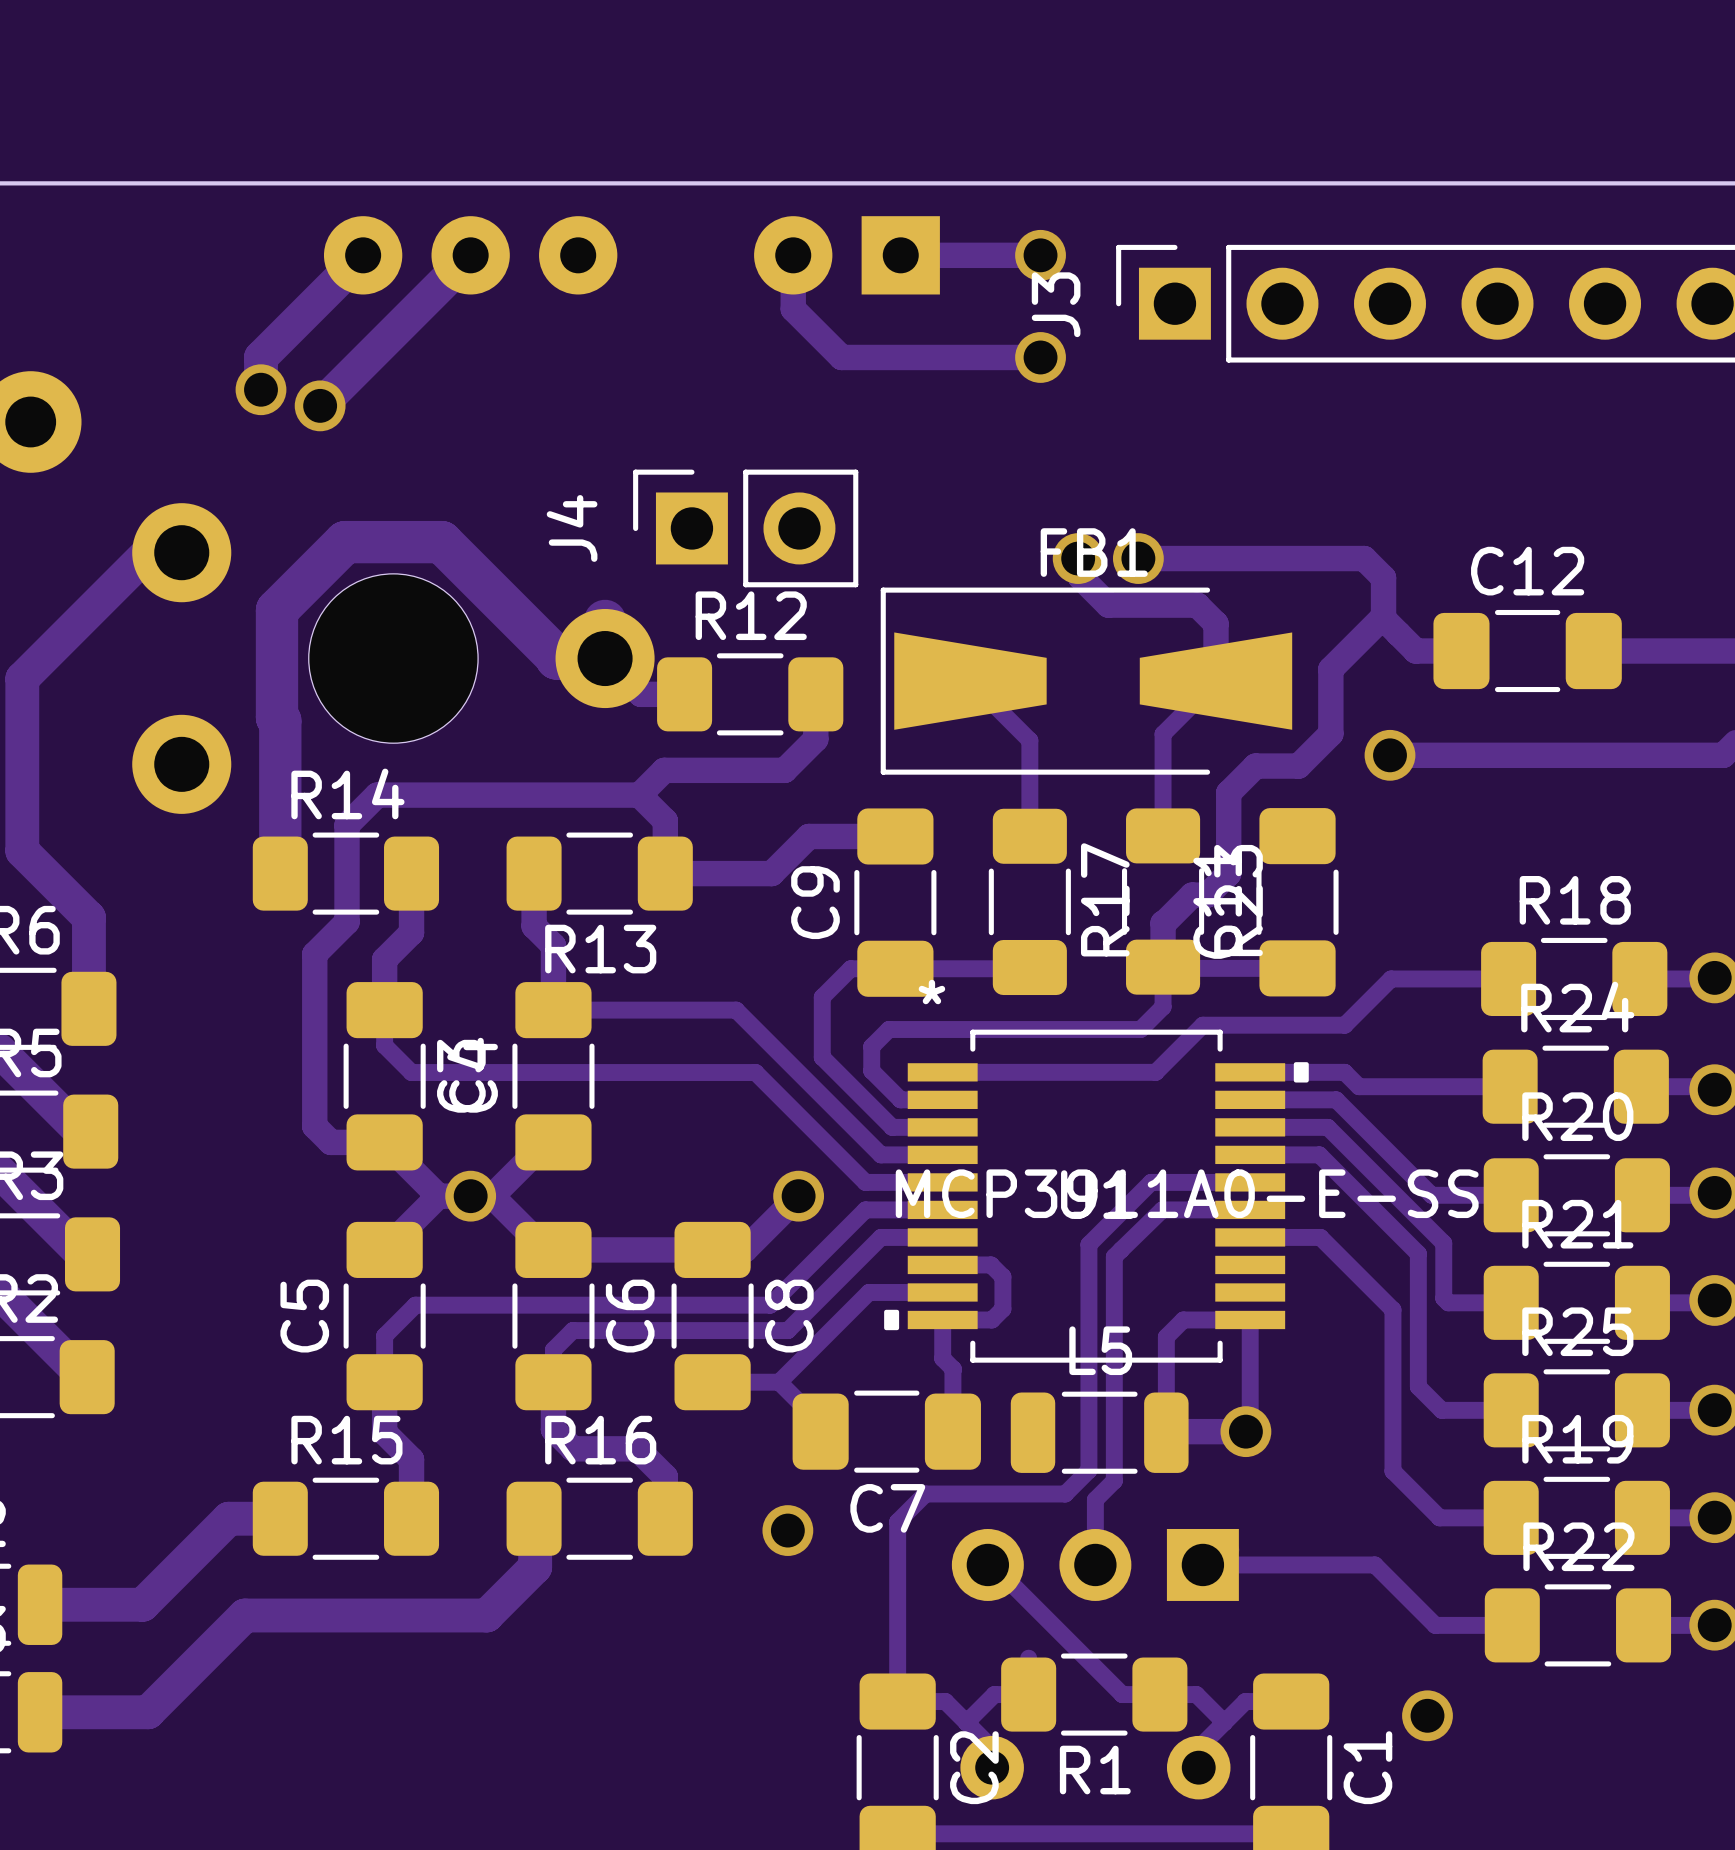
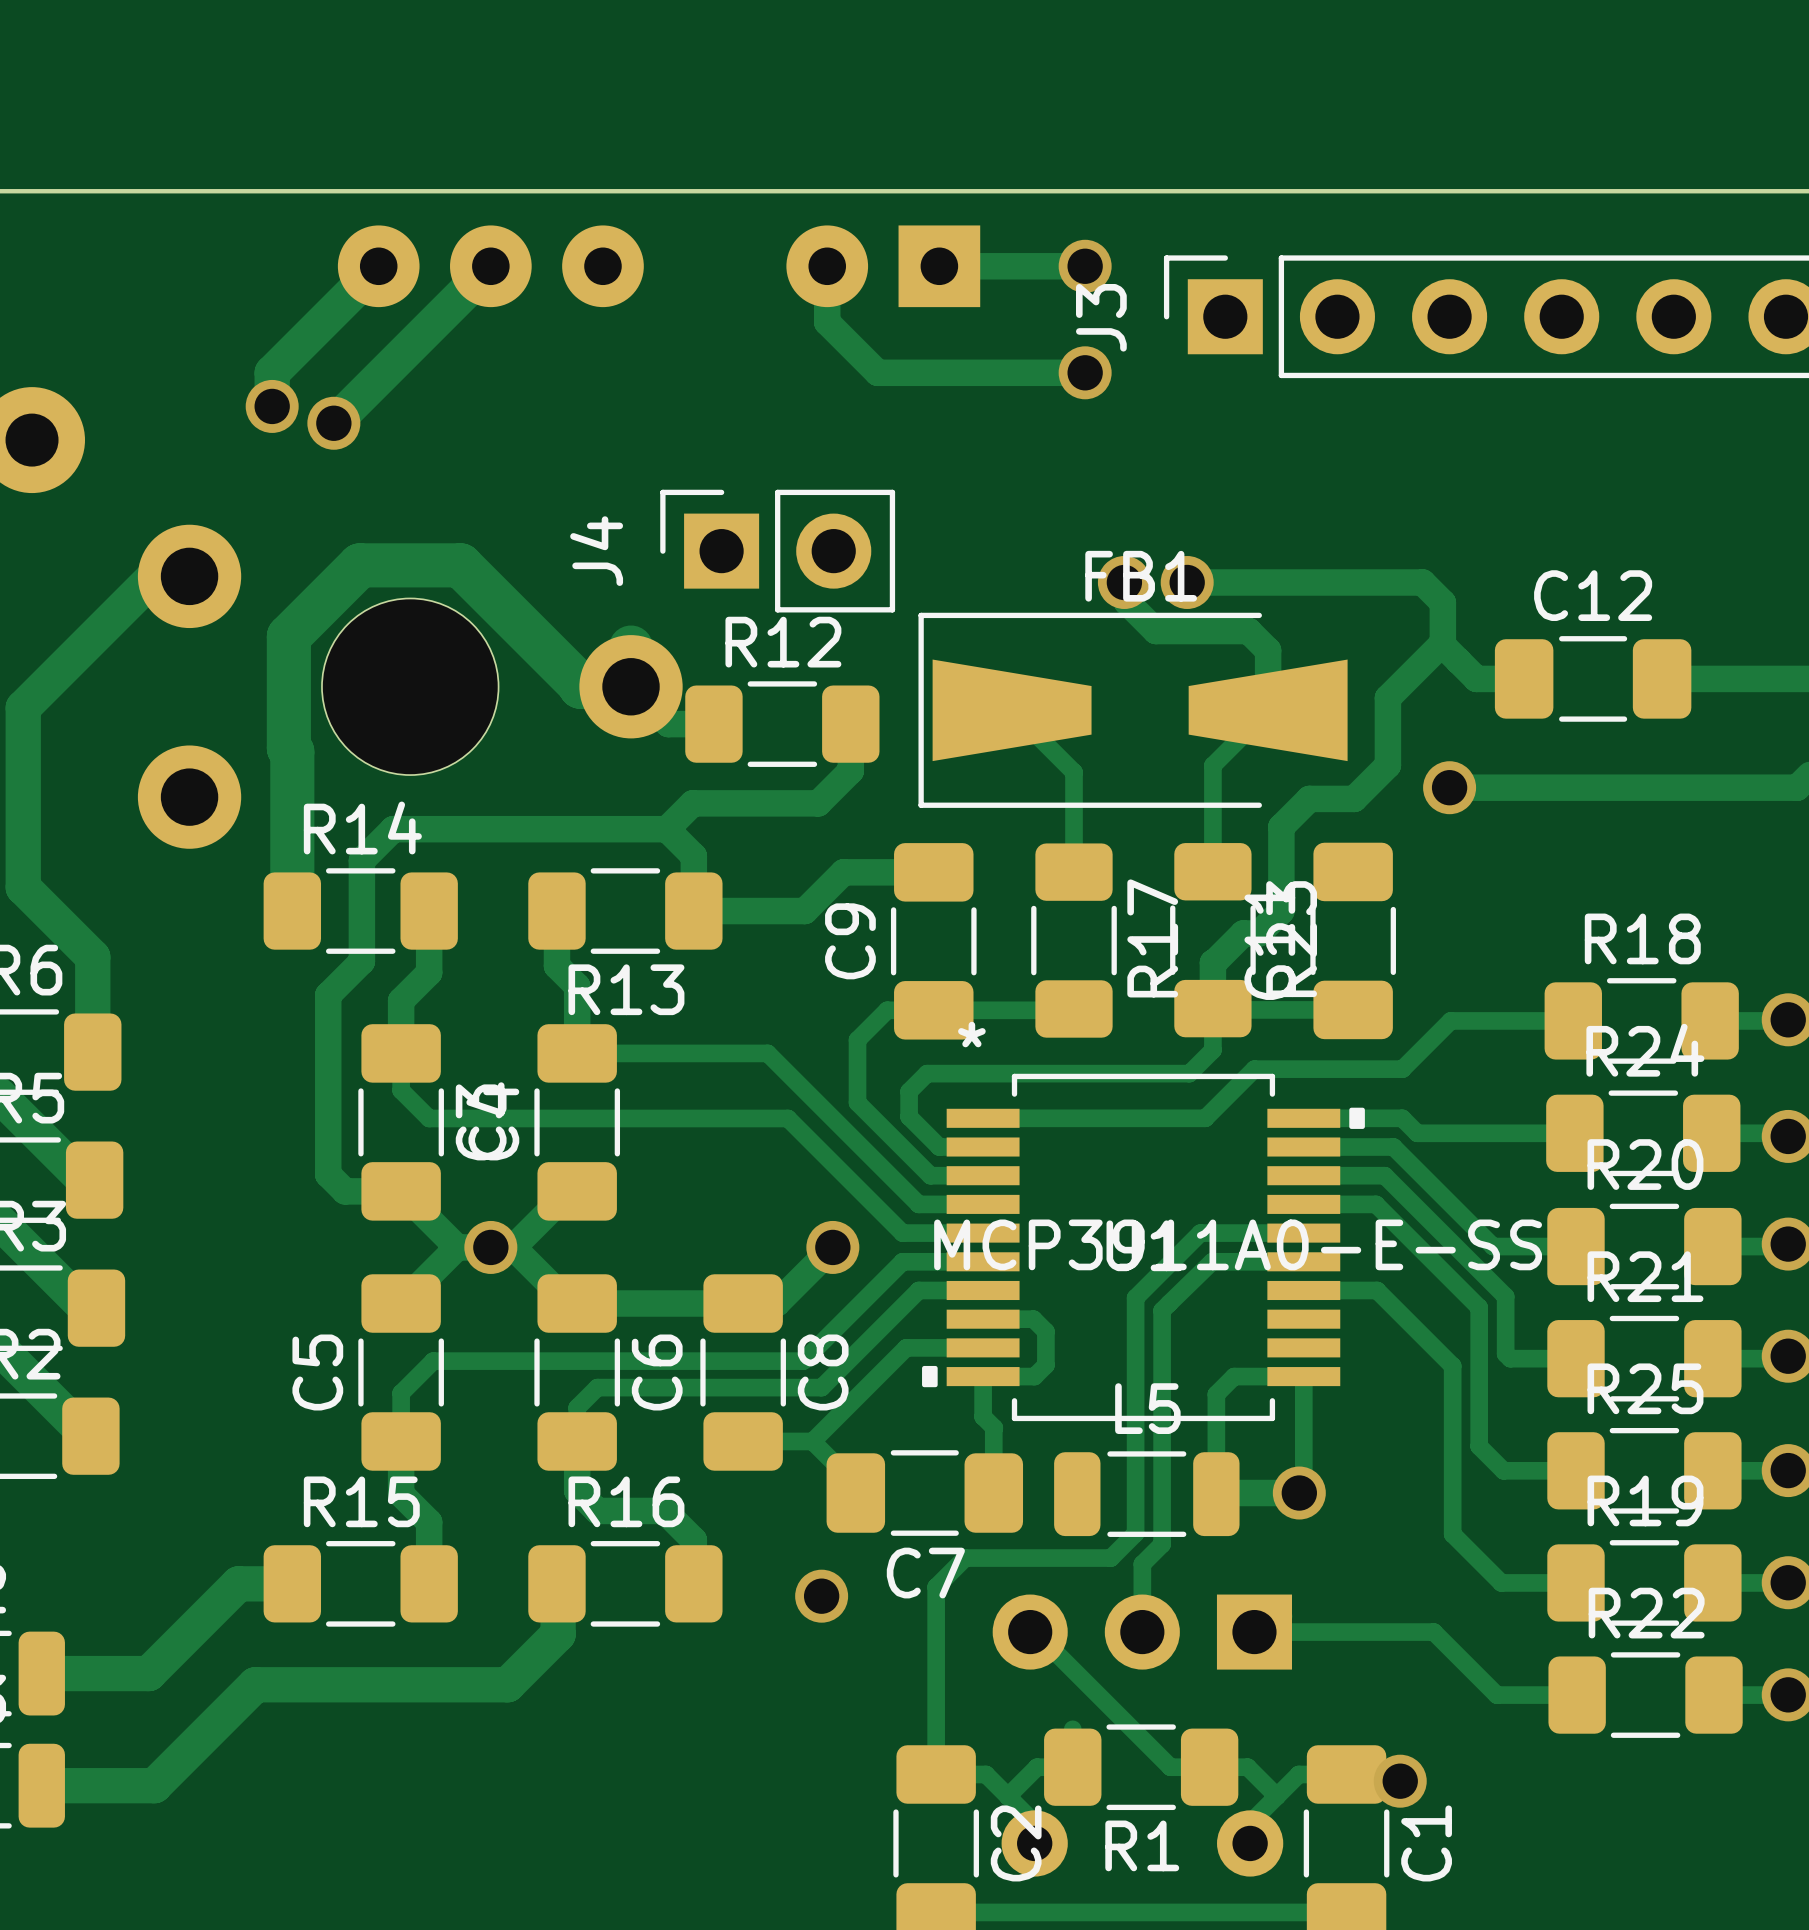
via position: (1427, 1715) -> (1400, 1781)

